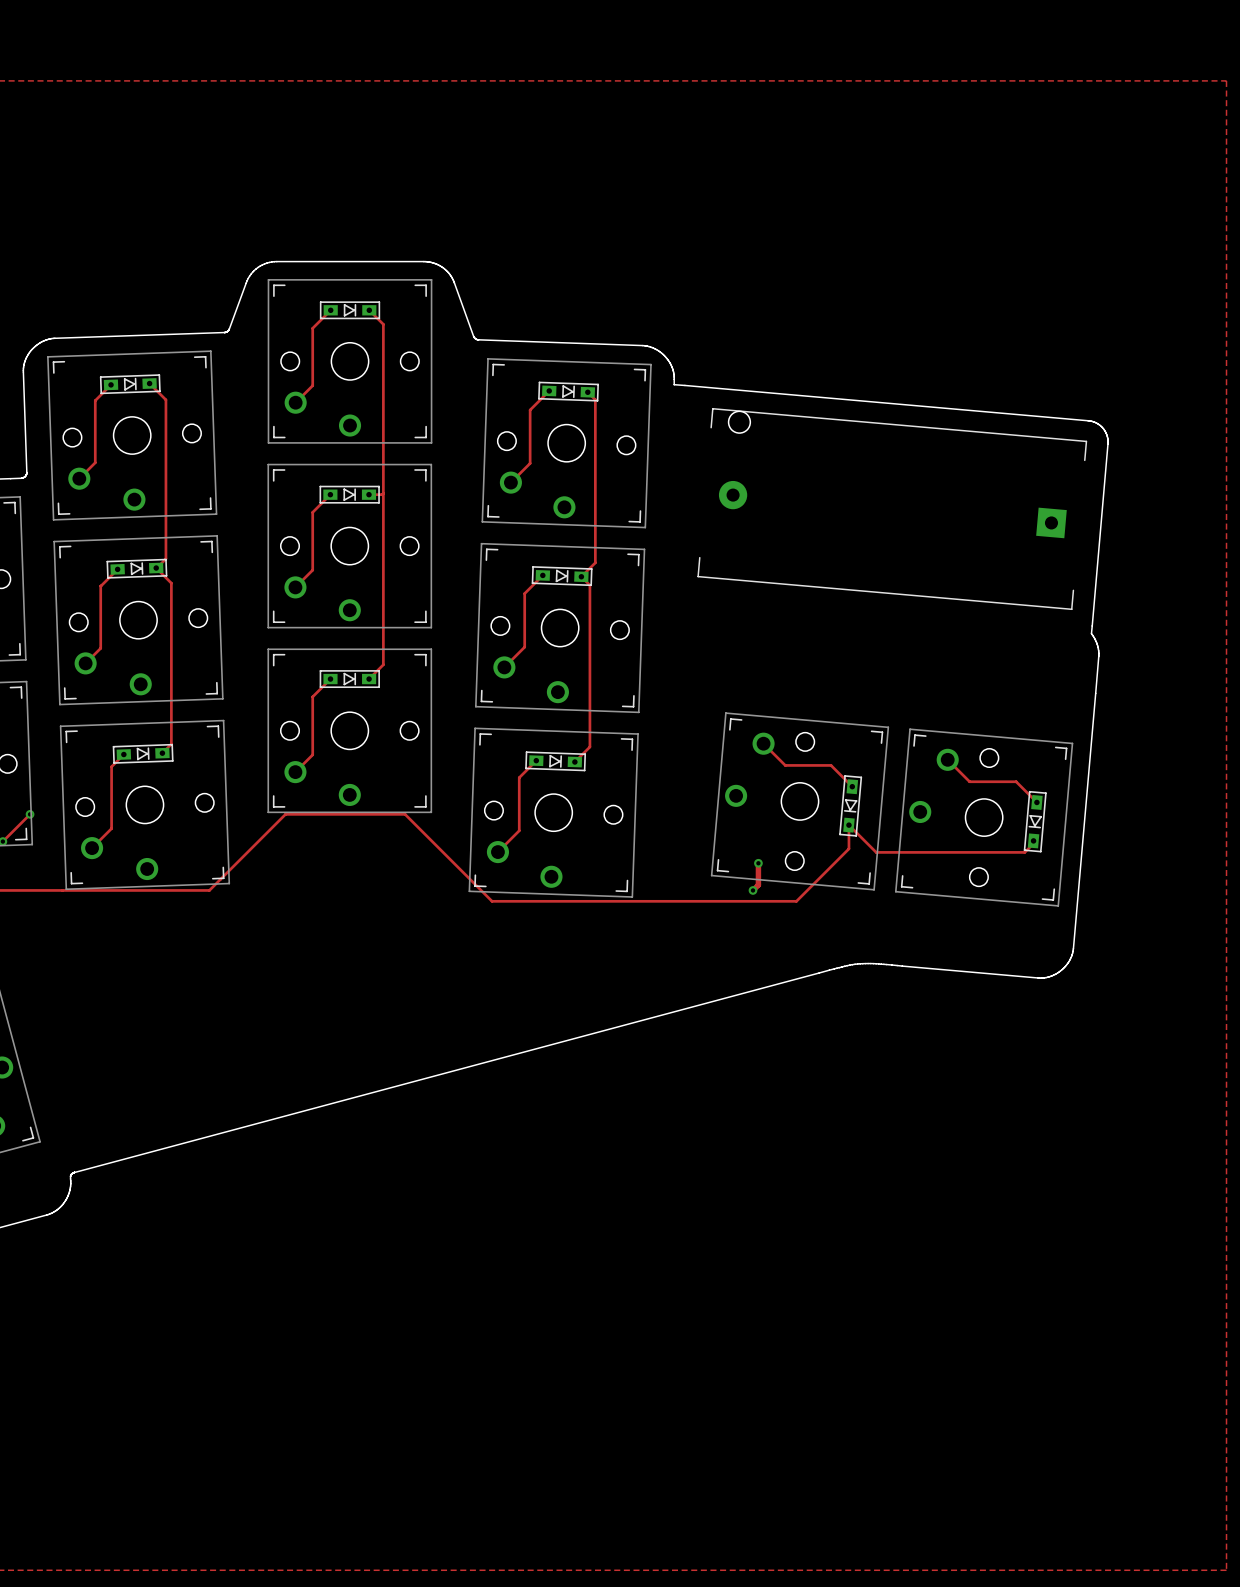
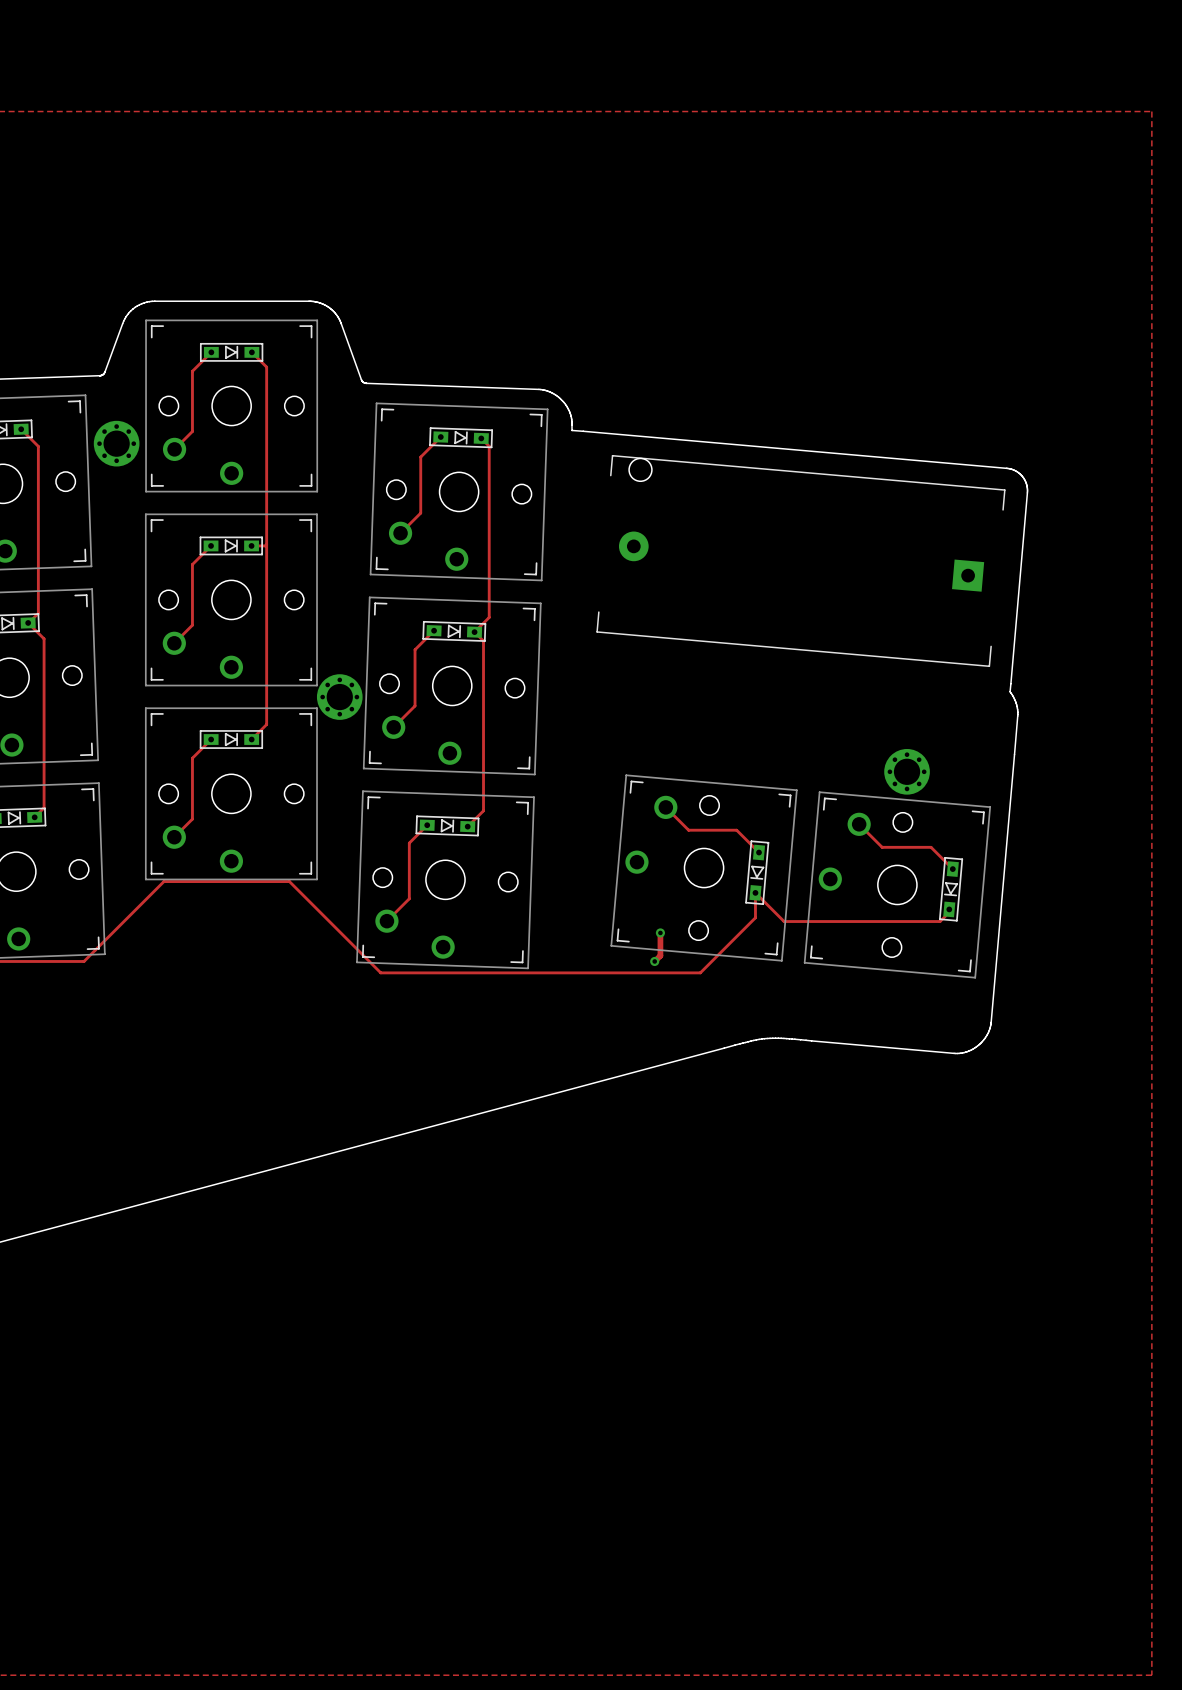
part: none -> (116, 443)
part: none -> (339, 697)
part: none -> (907, 771)

